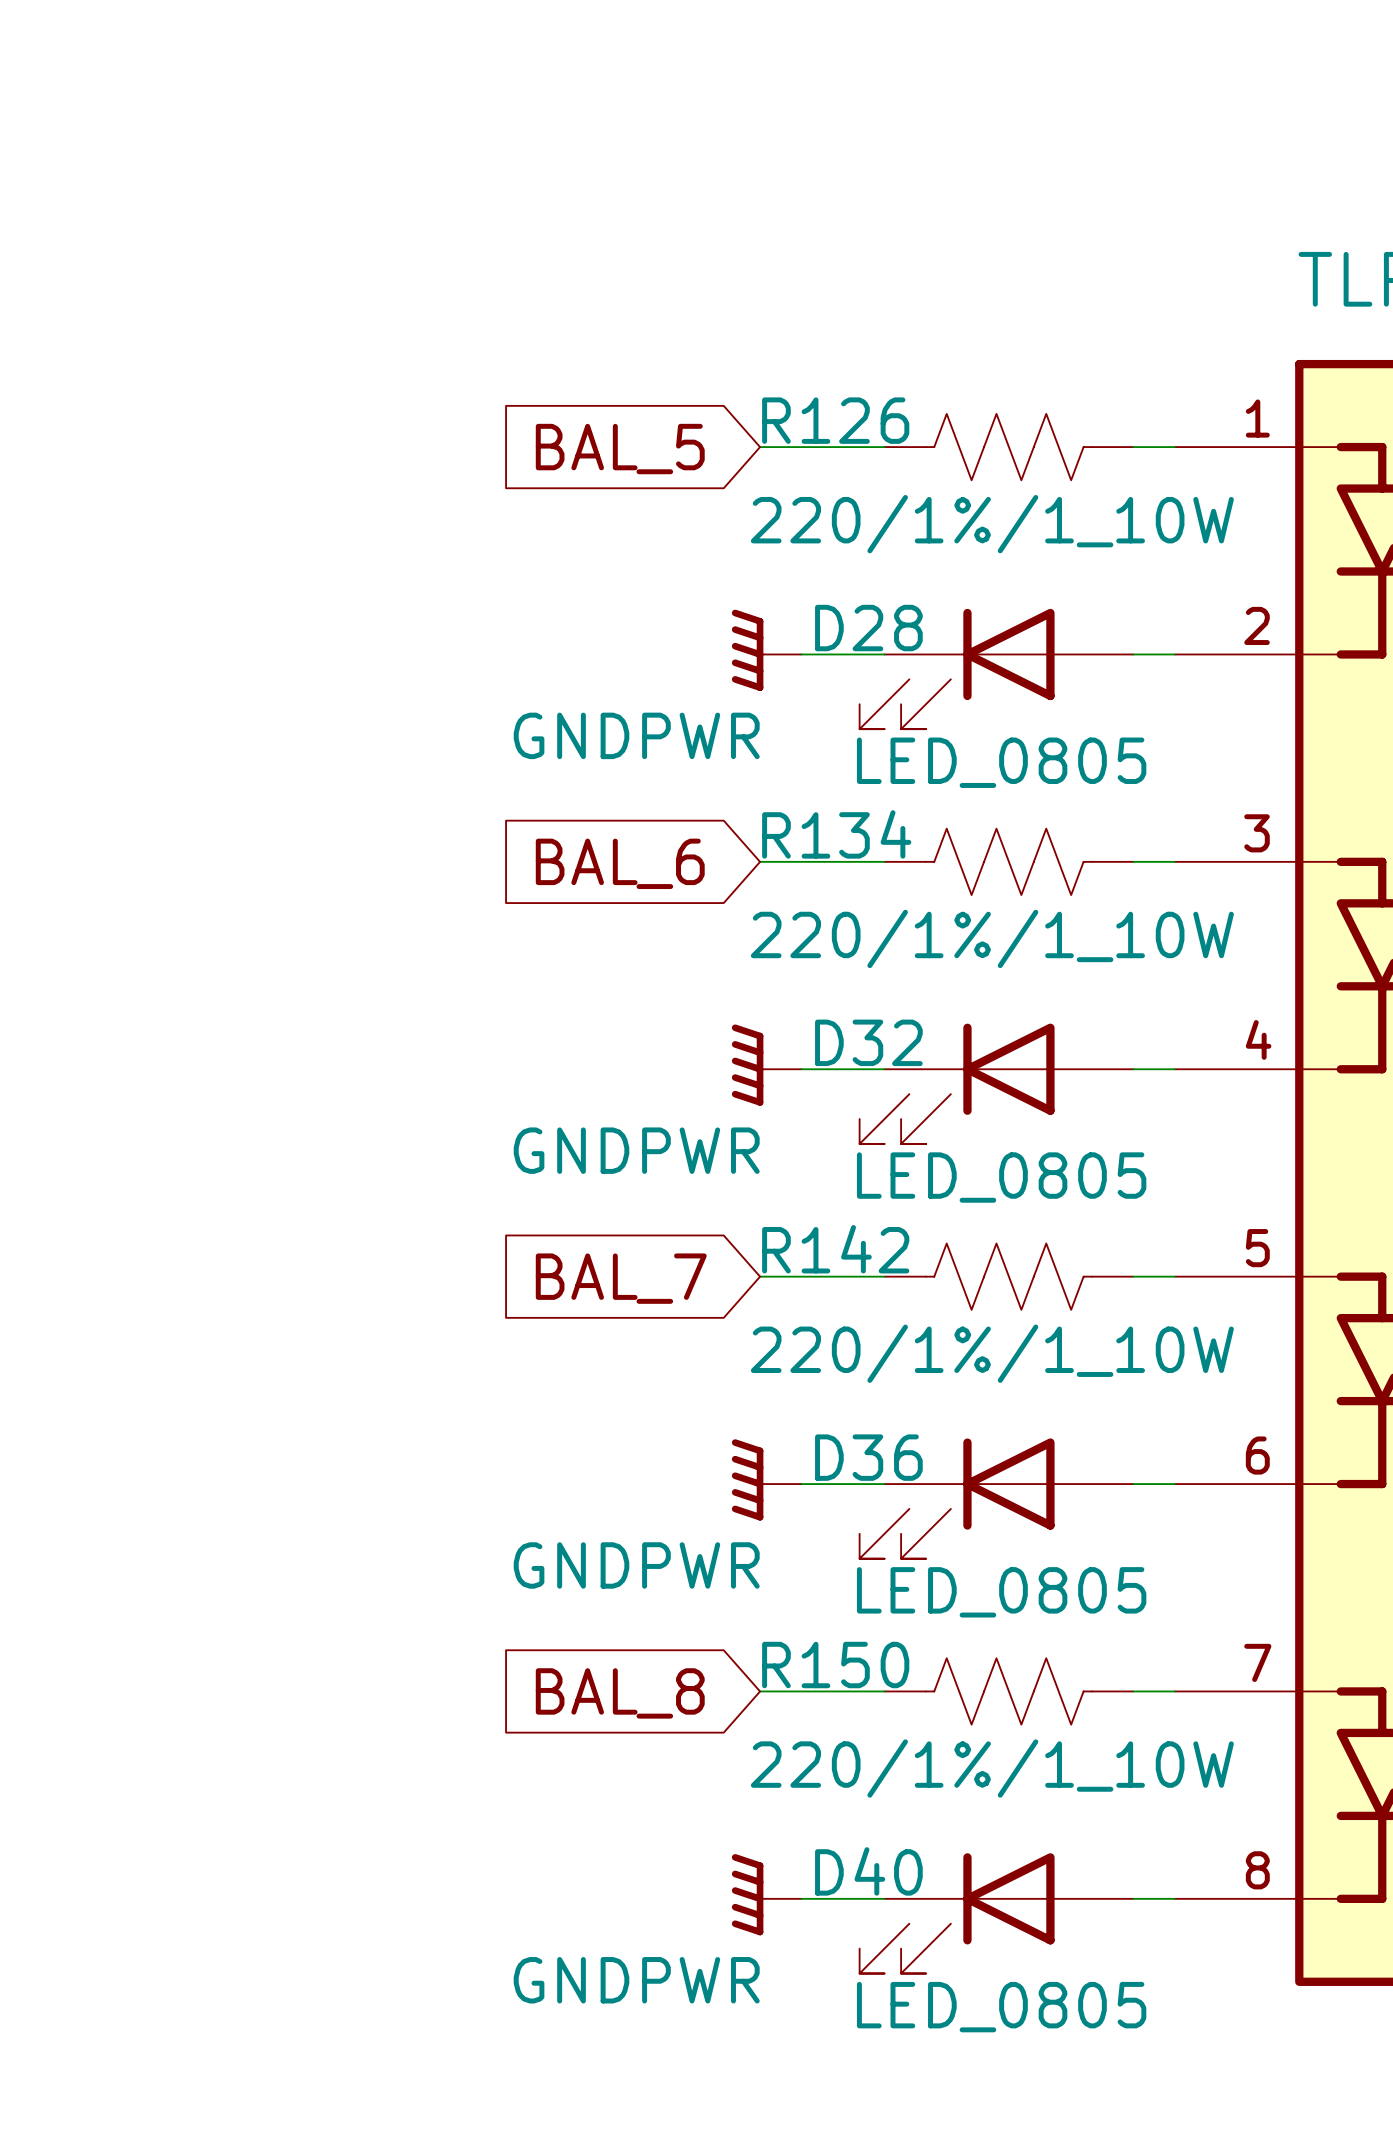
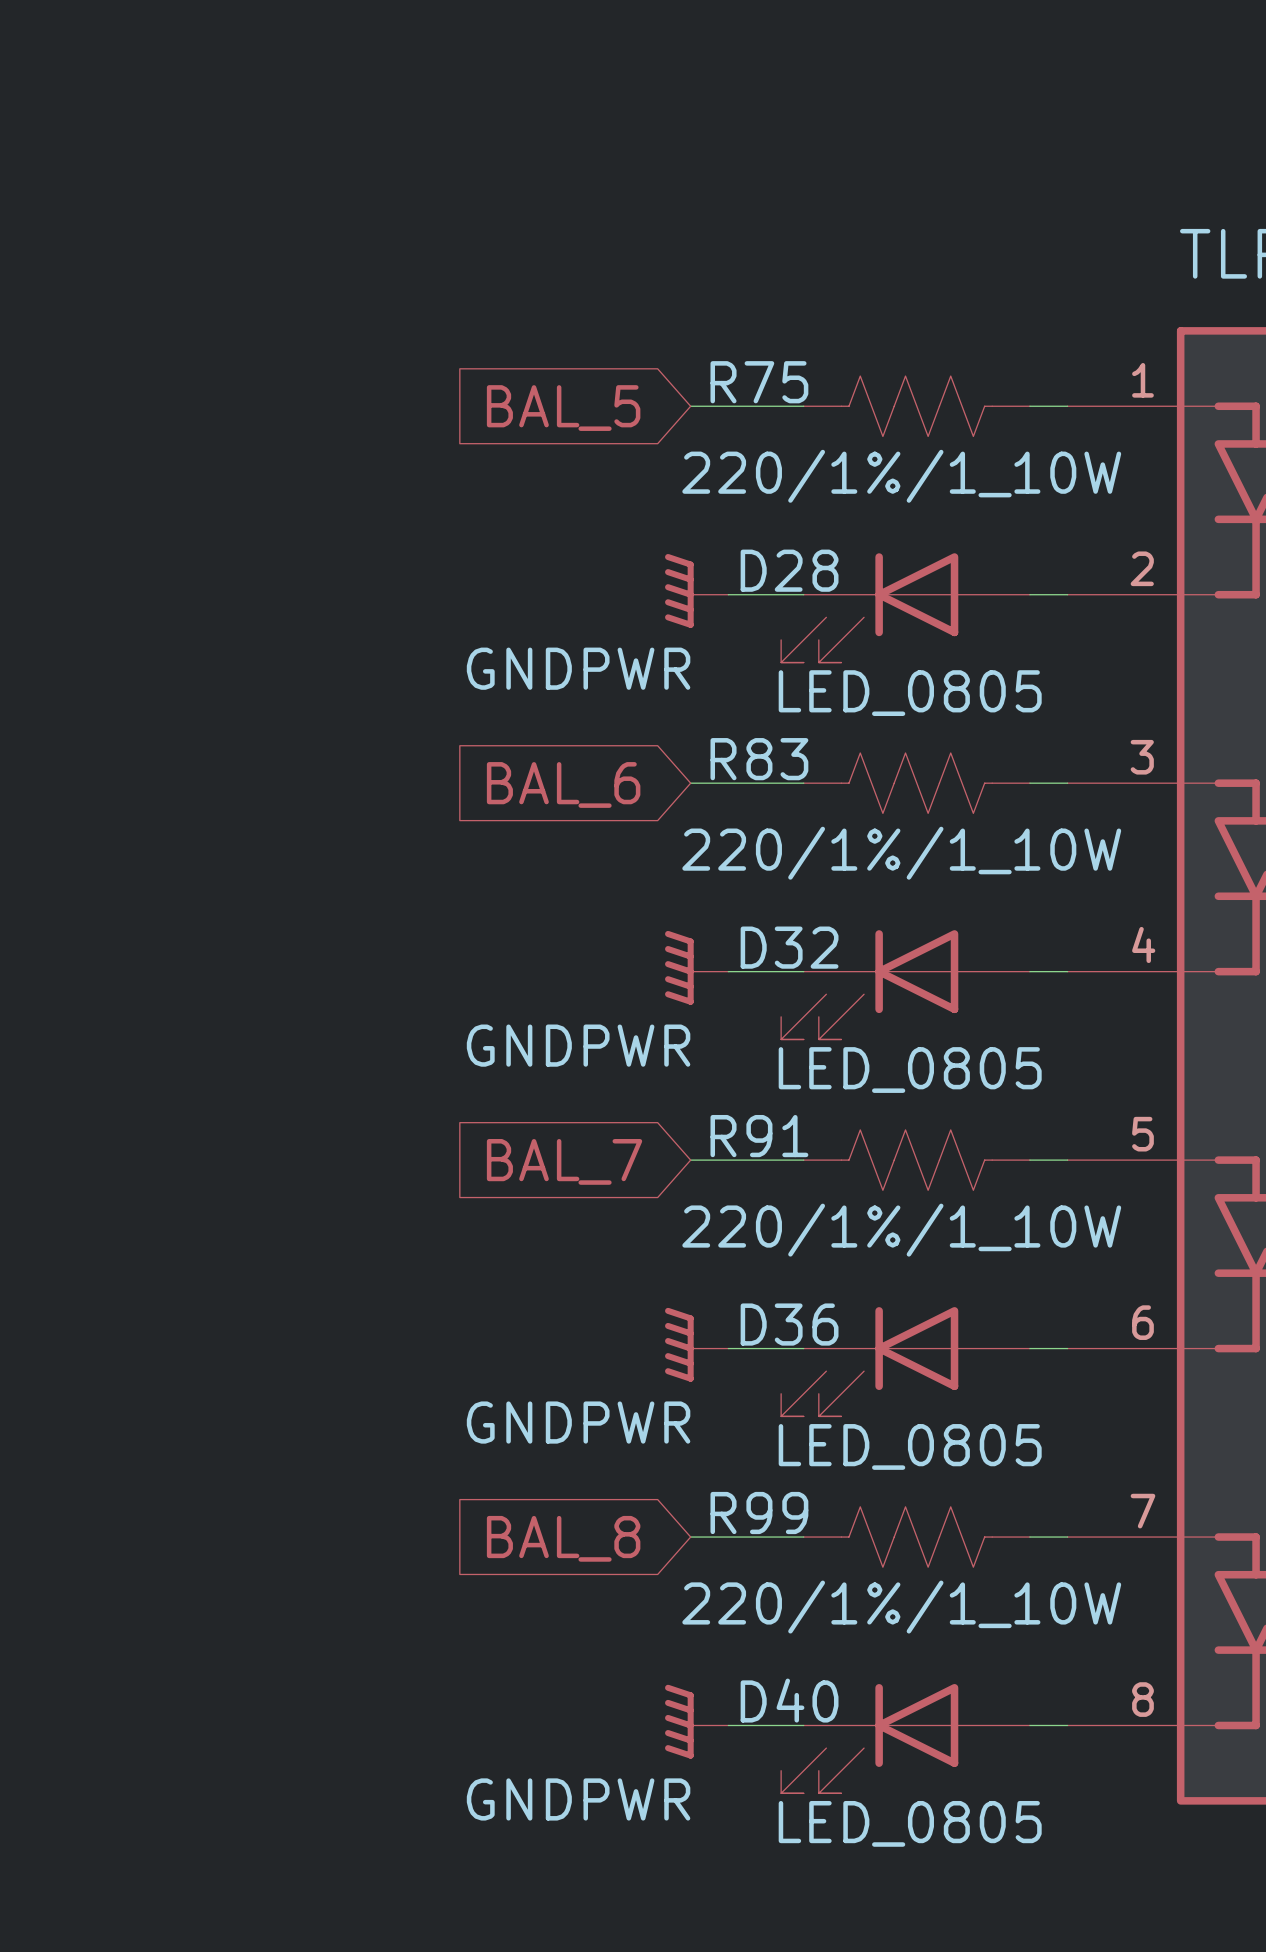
R126 name: R126 (835, 420) -> R75 (759, 382)
R134 name: R134 (836, 834) -> R83 (759, 759)
R142 name: R142 (835, 1249) -> R91 (759, 1136)
R150 name: R150 (835, 1665) -> R99 (759, 1513)

